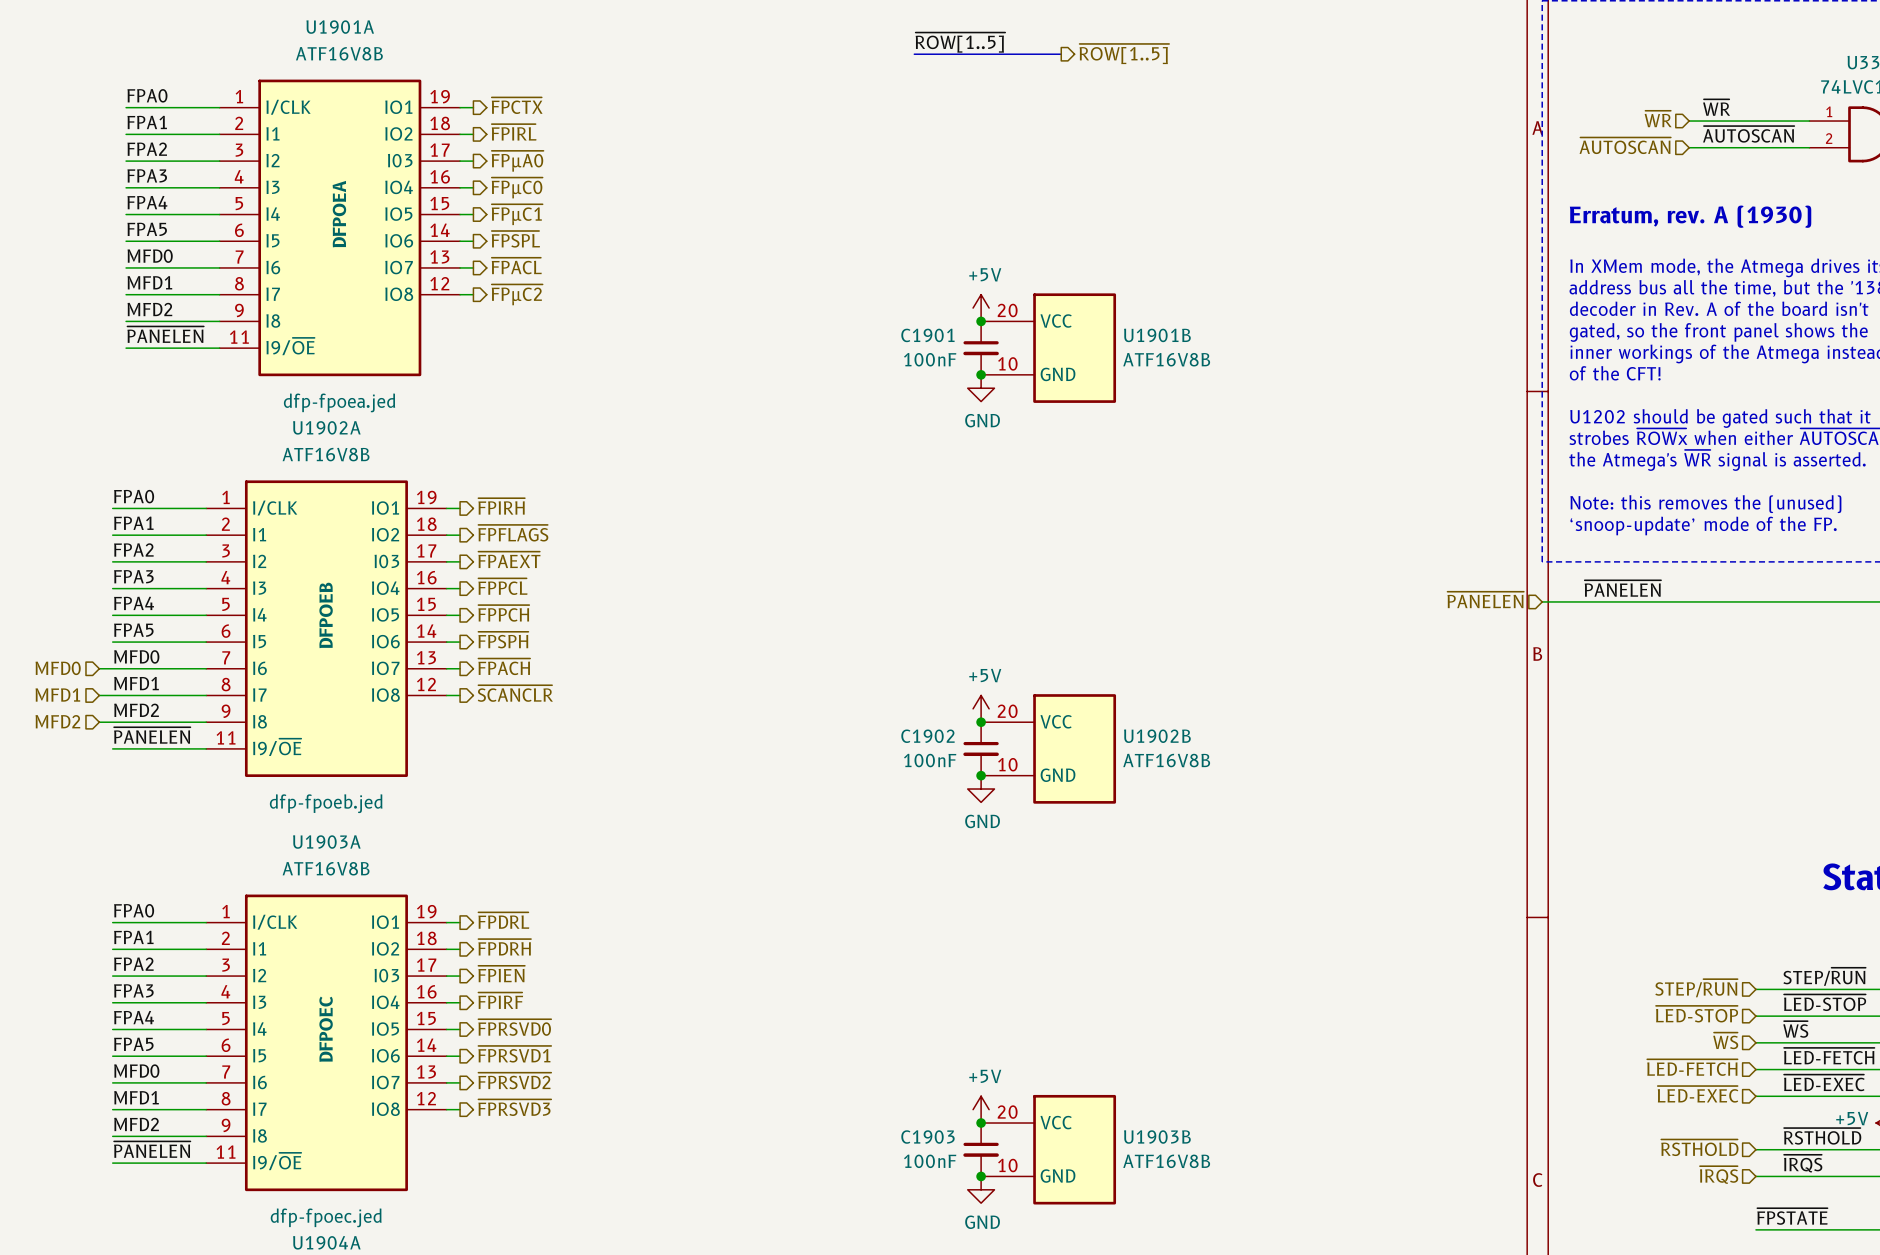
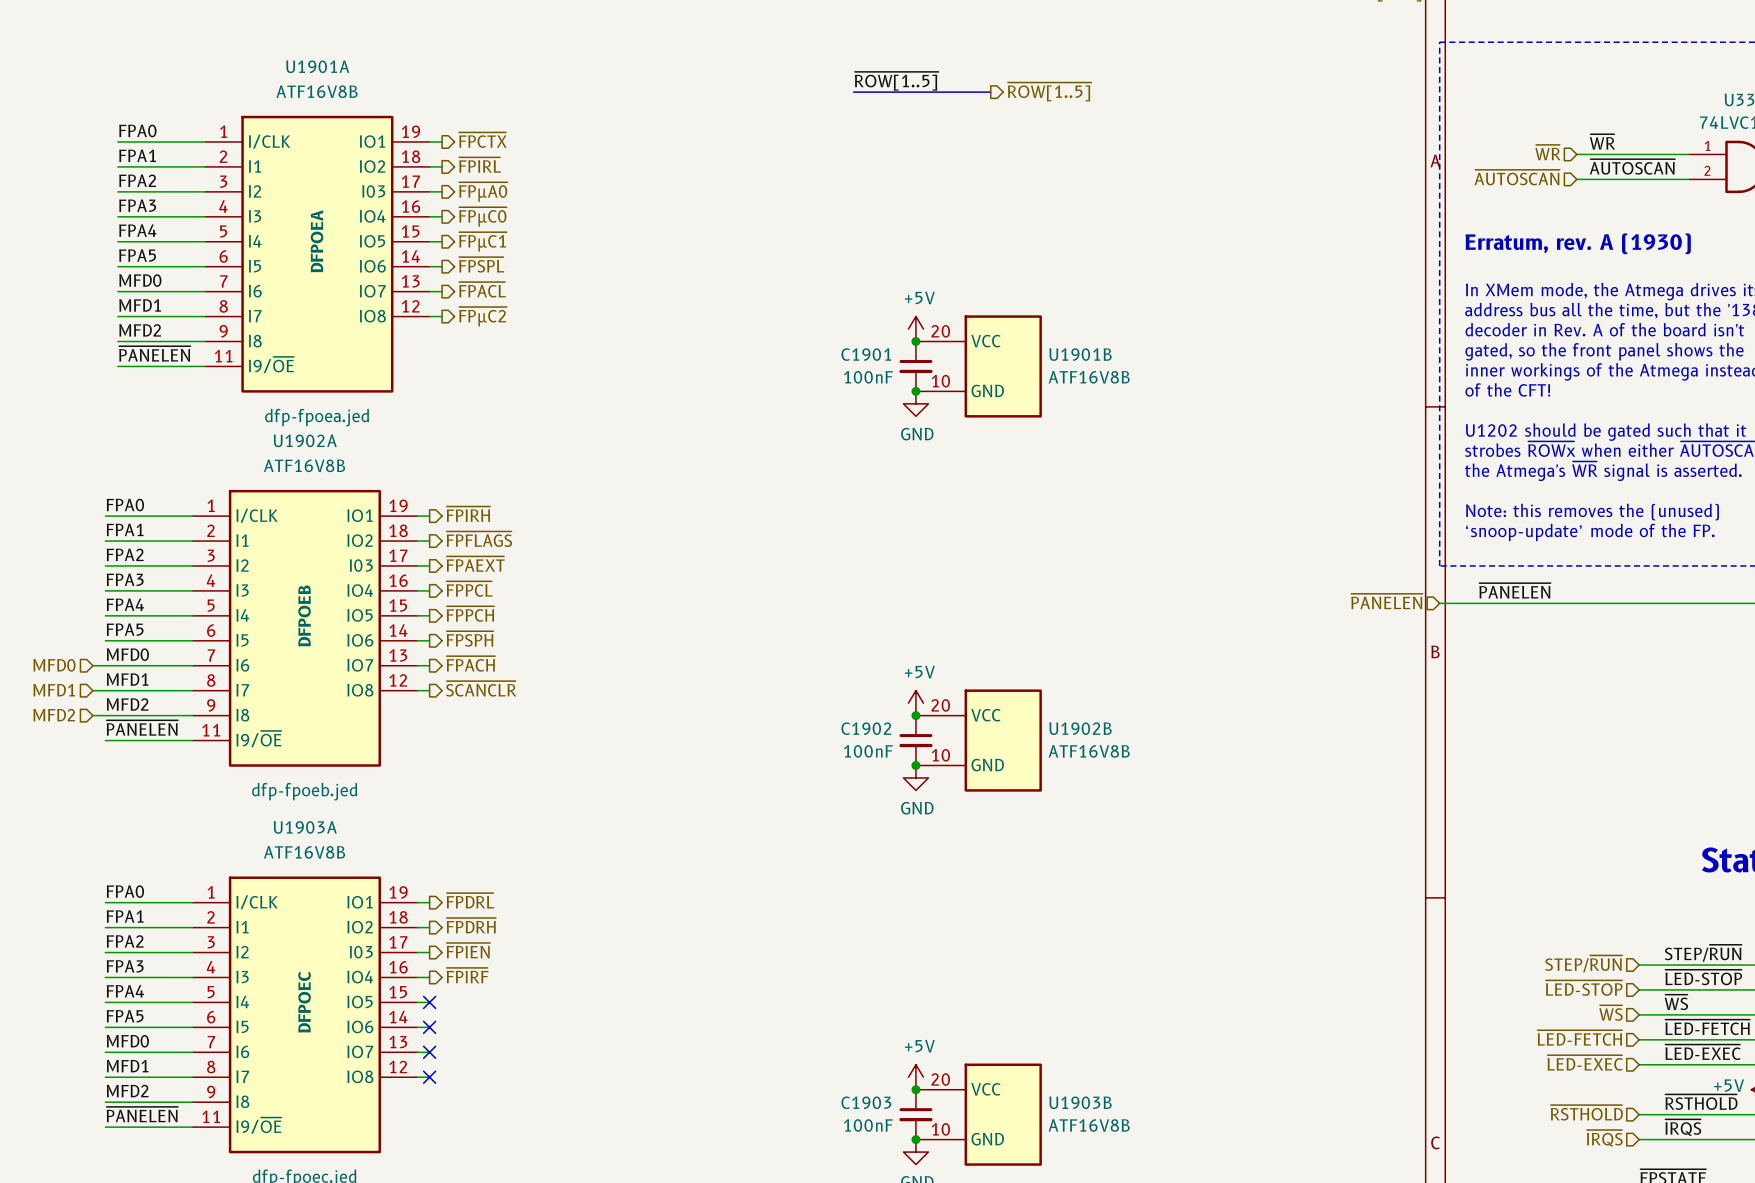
hierarchical label: ~{FPRSVD0} (514, 1027) -> none
no-connect mark: none -> (429, 1002)
hierarchical label: ~{FPRSVD1} (514, 1054) -> none
no-connect mark: none -> (429, 1027)
hierarchical label: ~{FPRSVD2} (514, 1080) -> none
no-connect mark: none -> (429, 1052)
hierarchical label: ~{FPRSVD3} (514, 1107) -> none
no-connect mark: none -> (429, 1077)

